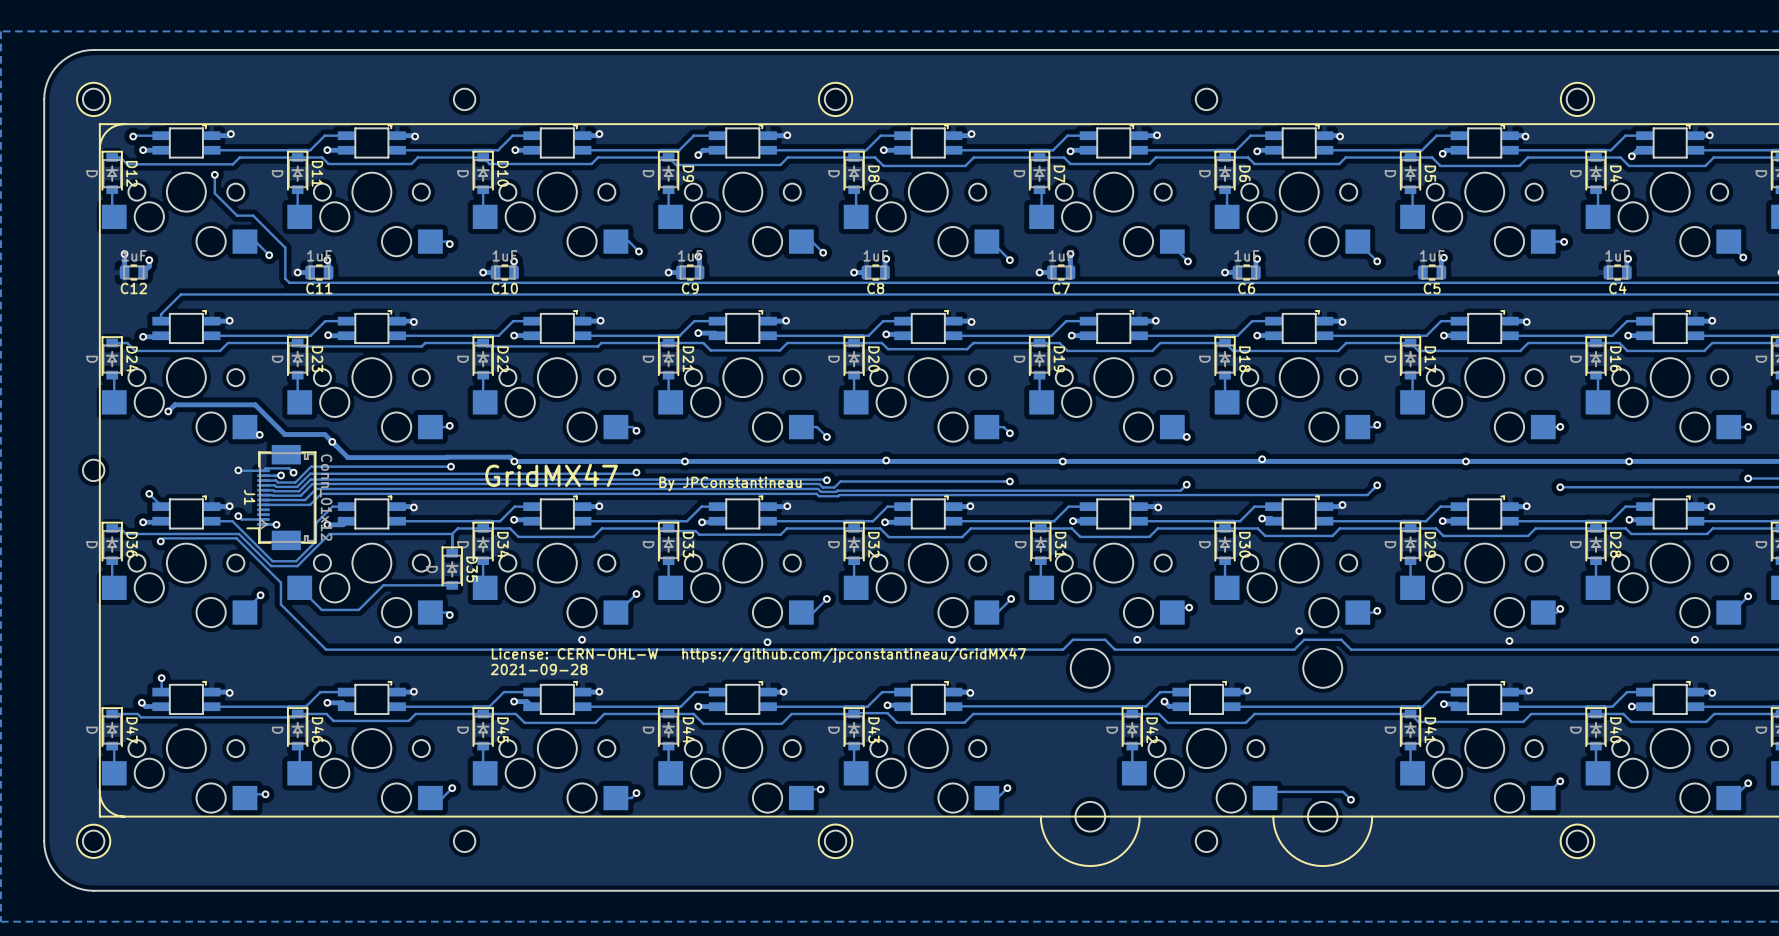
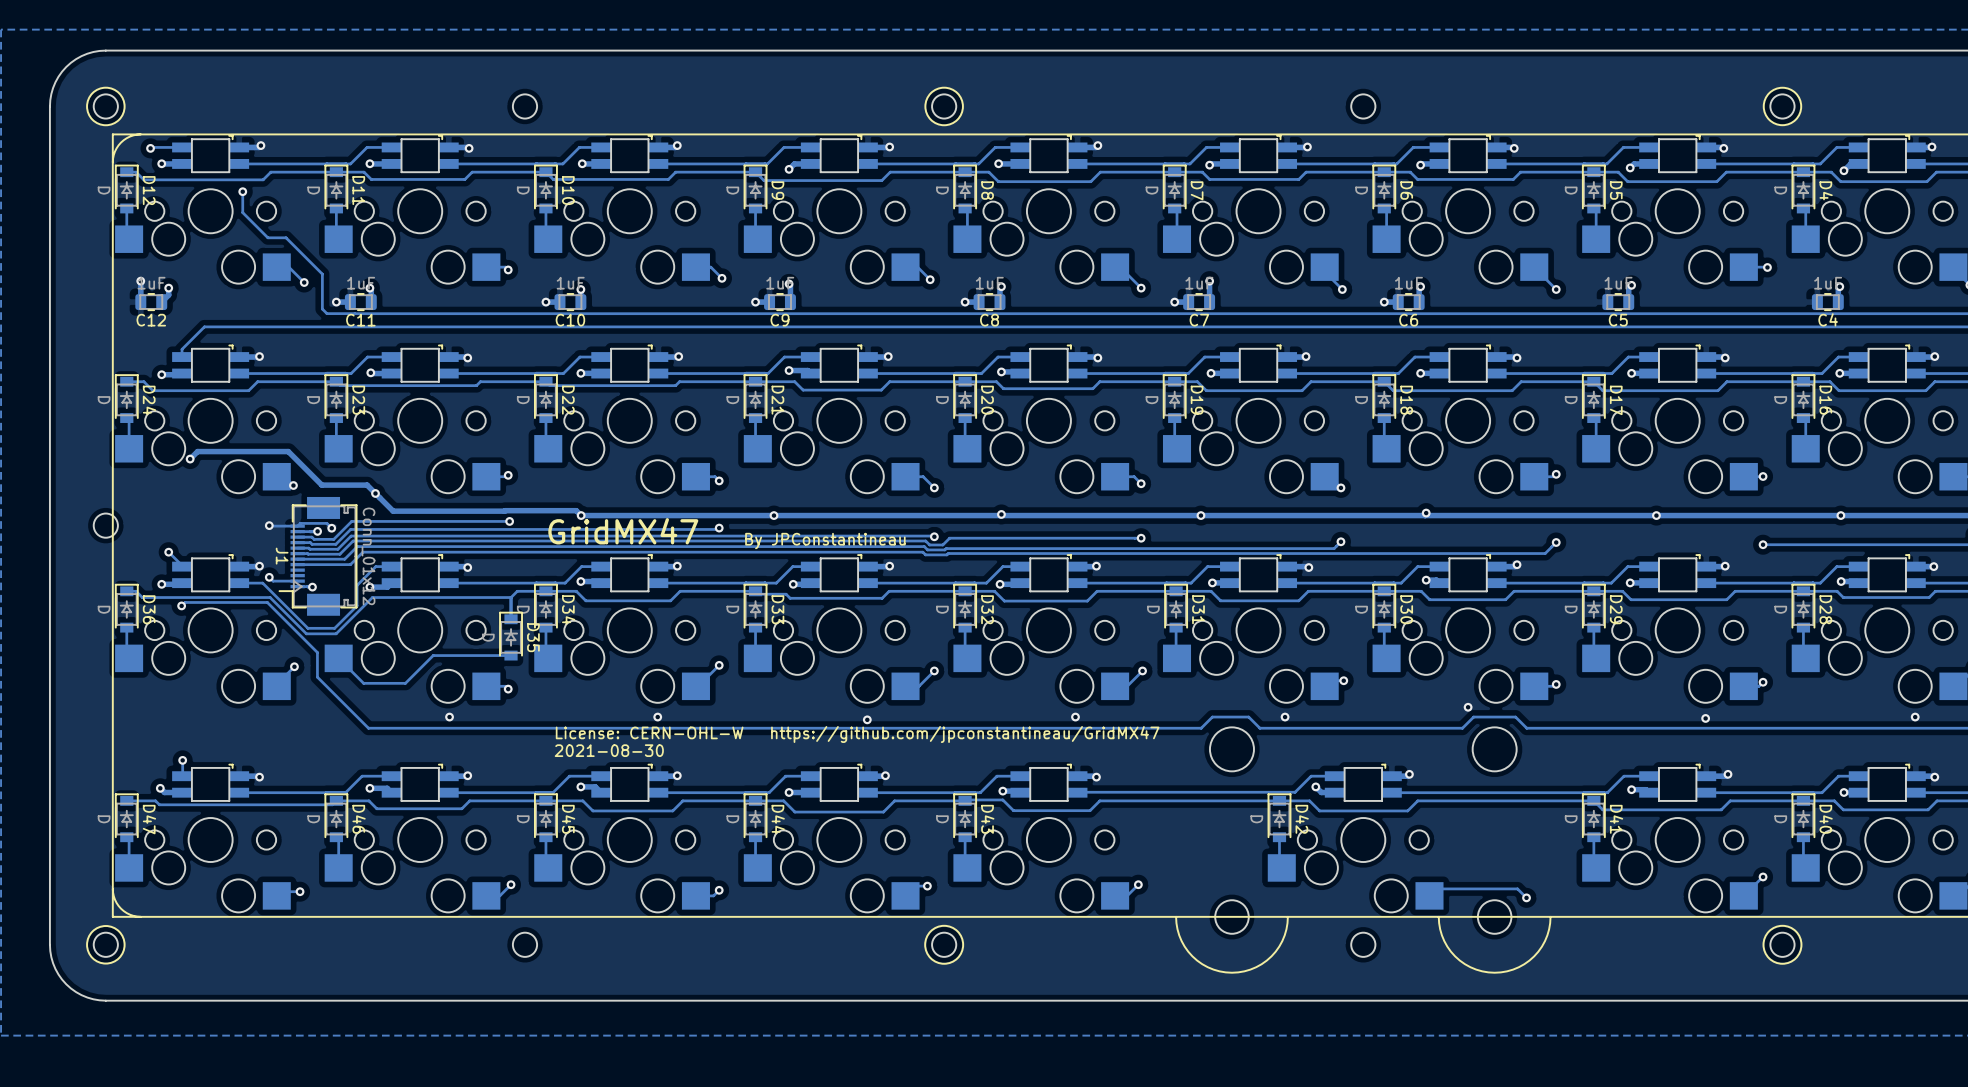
text: 2021-09-28 (539, 669) -> 2021-08-30 (609, 750)

